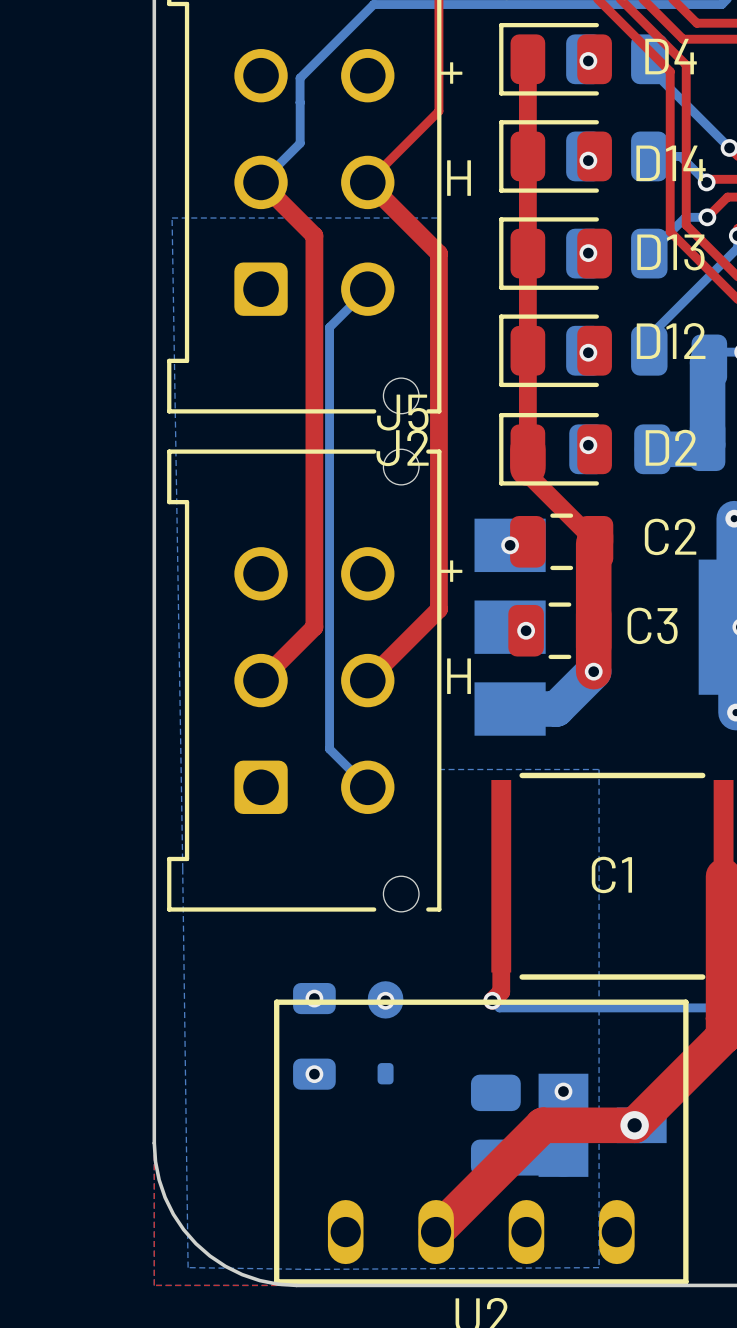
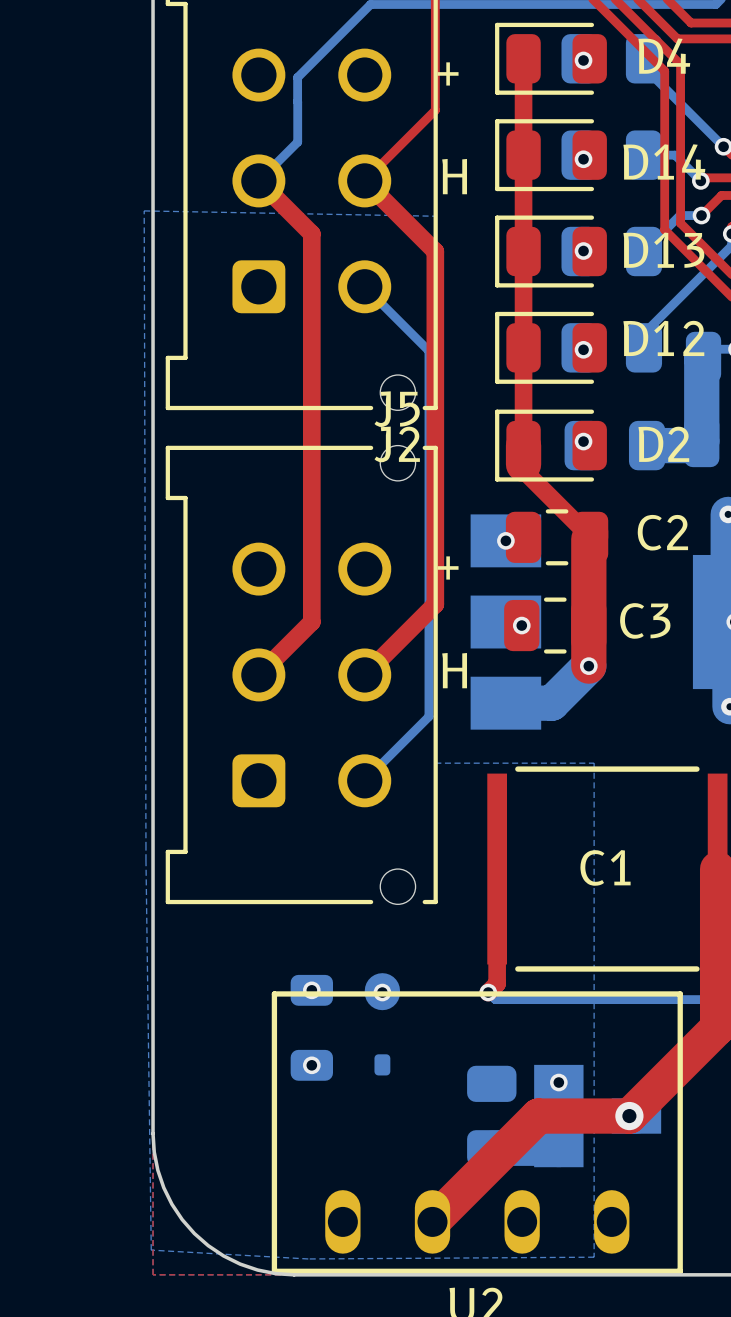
bottom zone outline: (438, 218) (172, 218) (188, 1267) (310, 1269) -> (435, 216) (144, 210) (145, 860) (151, 1250) (308, 1258)
bottom track: (367, 289) (329, 327) (329, 749) (367, 787) -> (364, 286) (428, 350) (428, 716) (364, 780)

